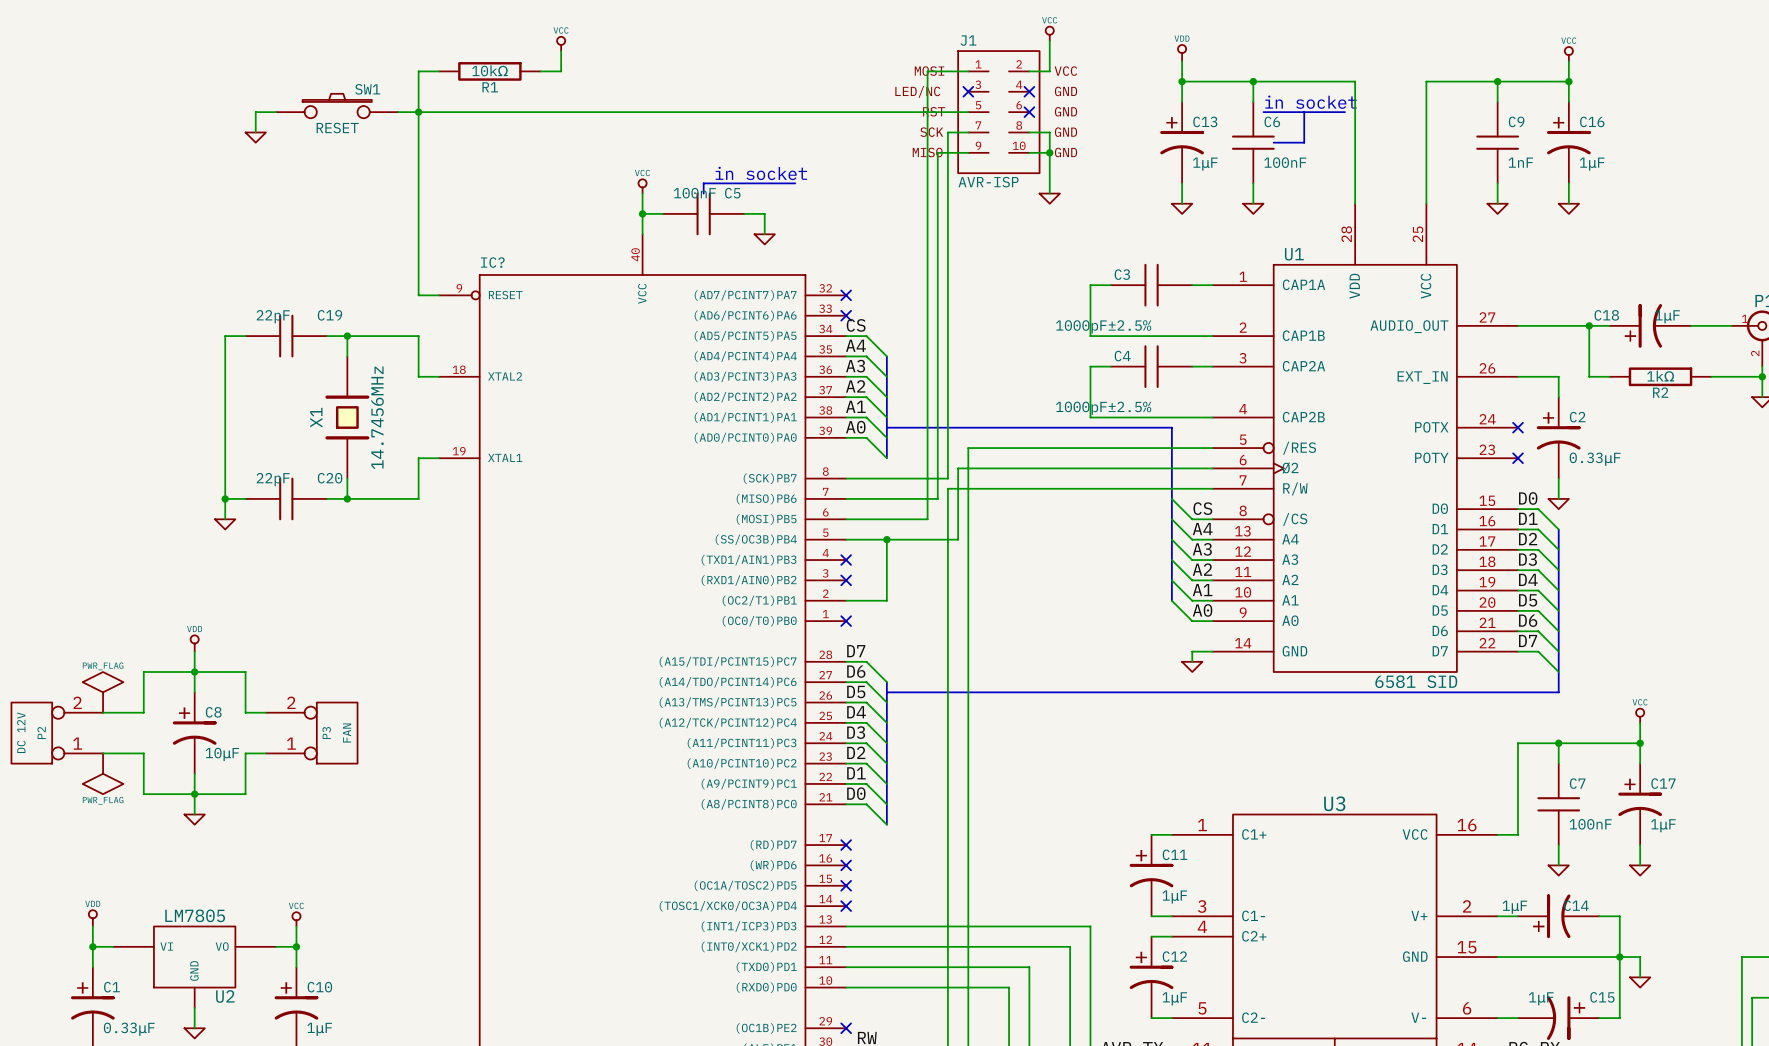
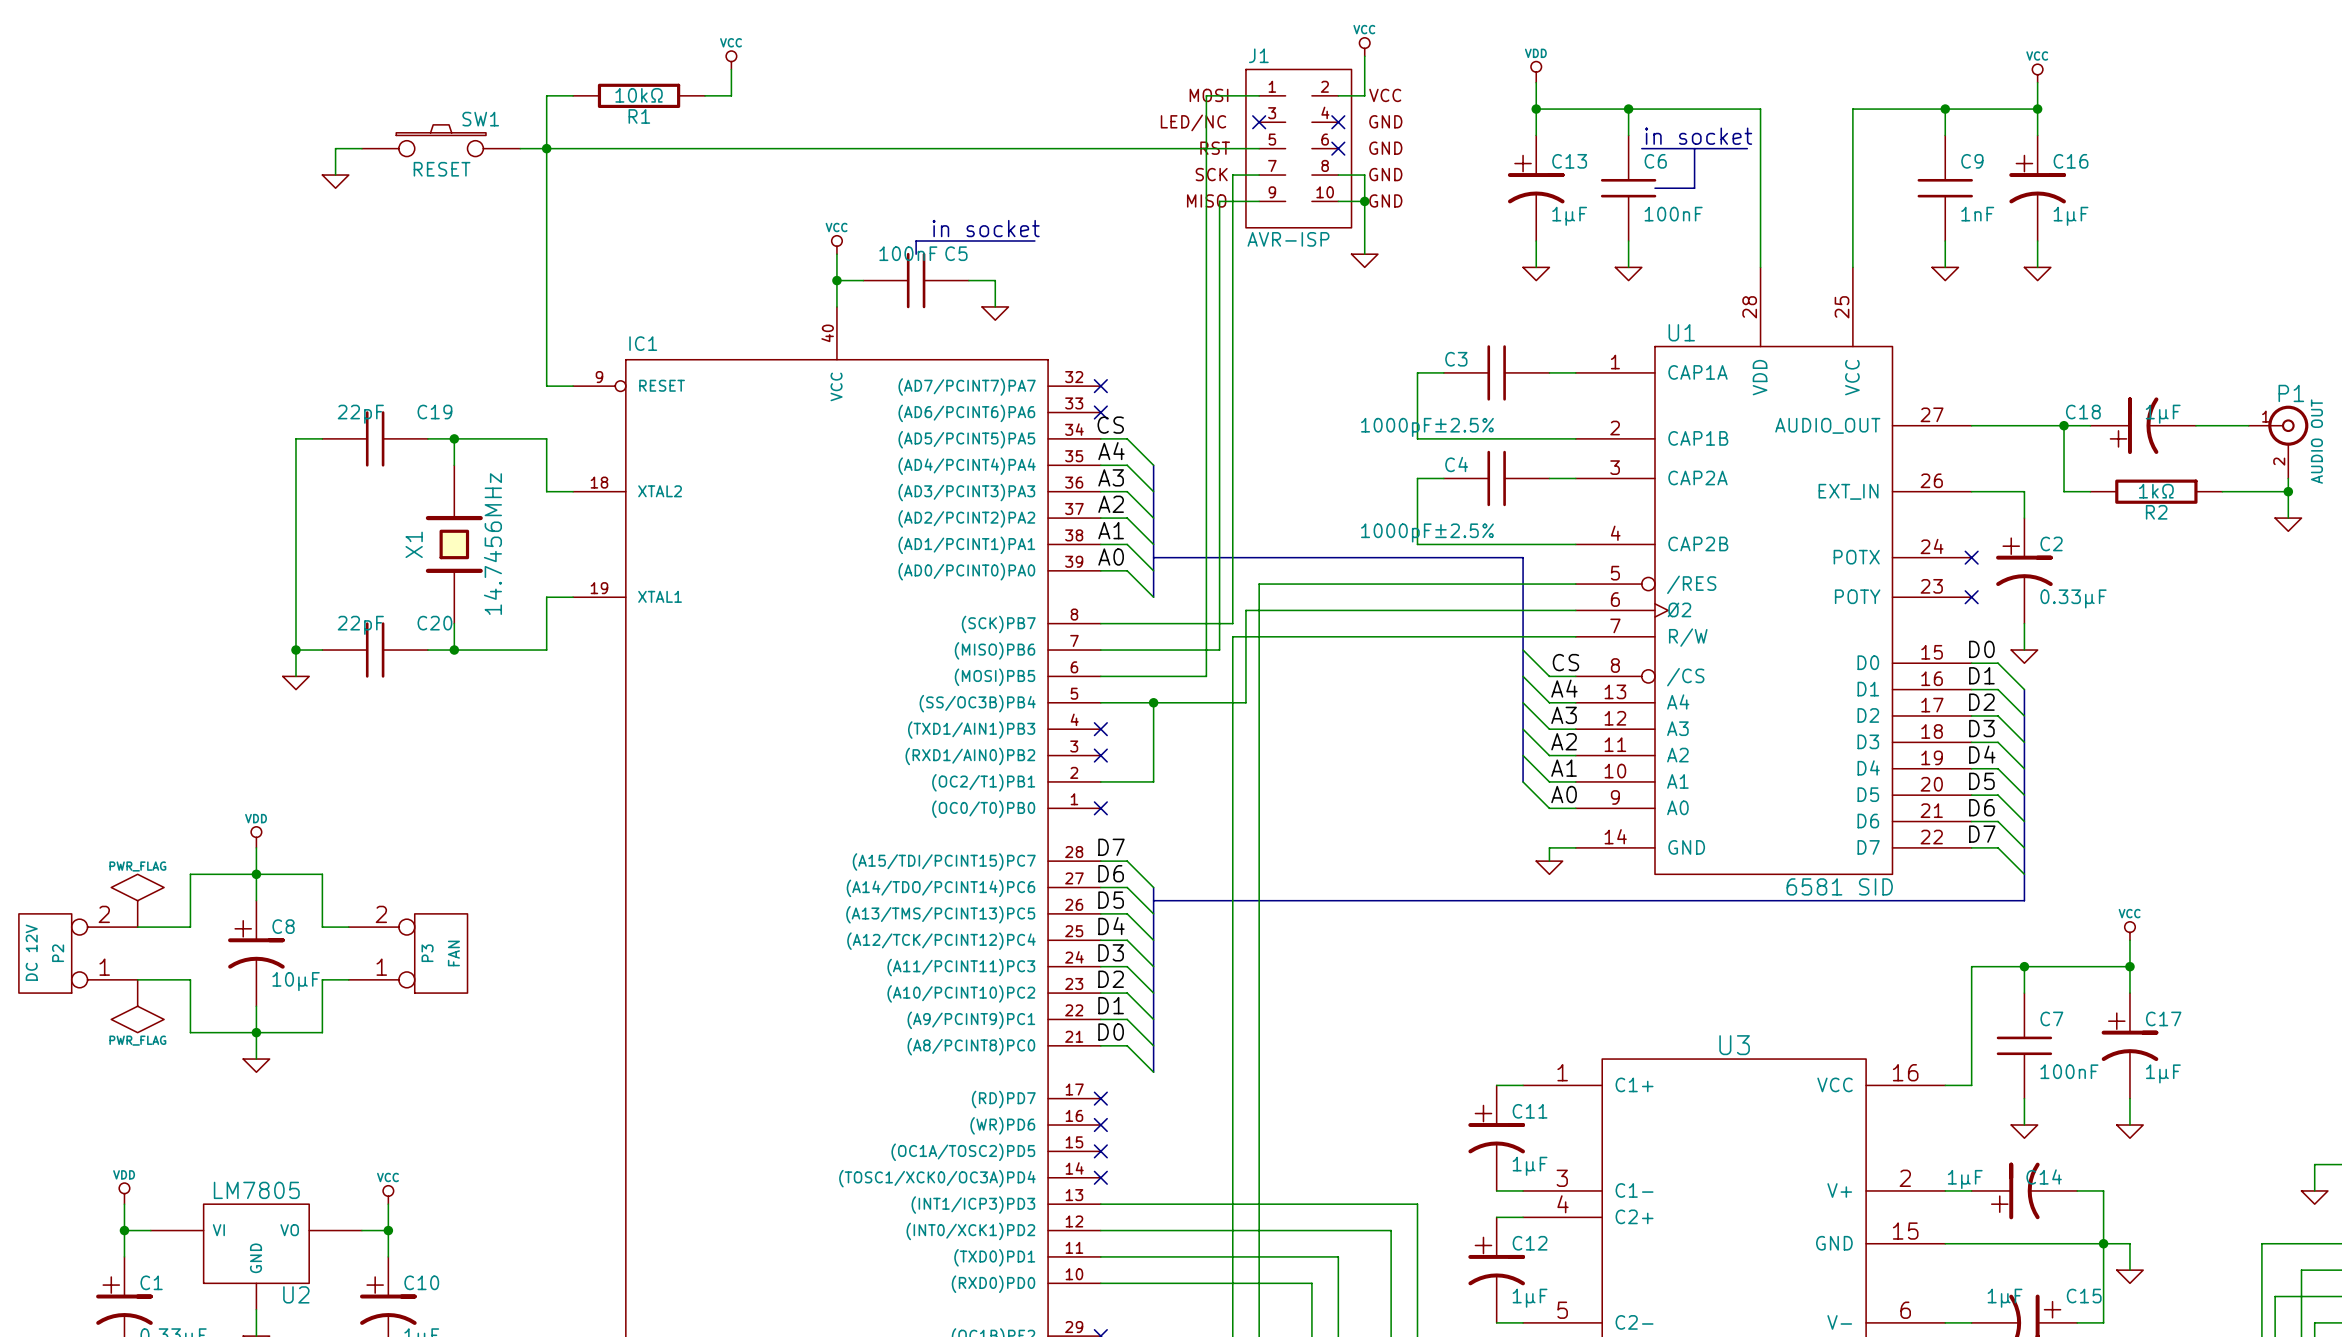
IC? name: IC? (492, 262) -> IC1 (643, 343)

